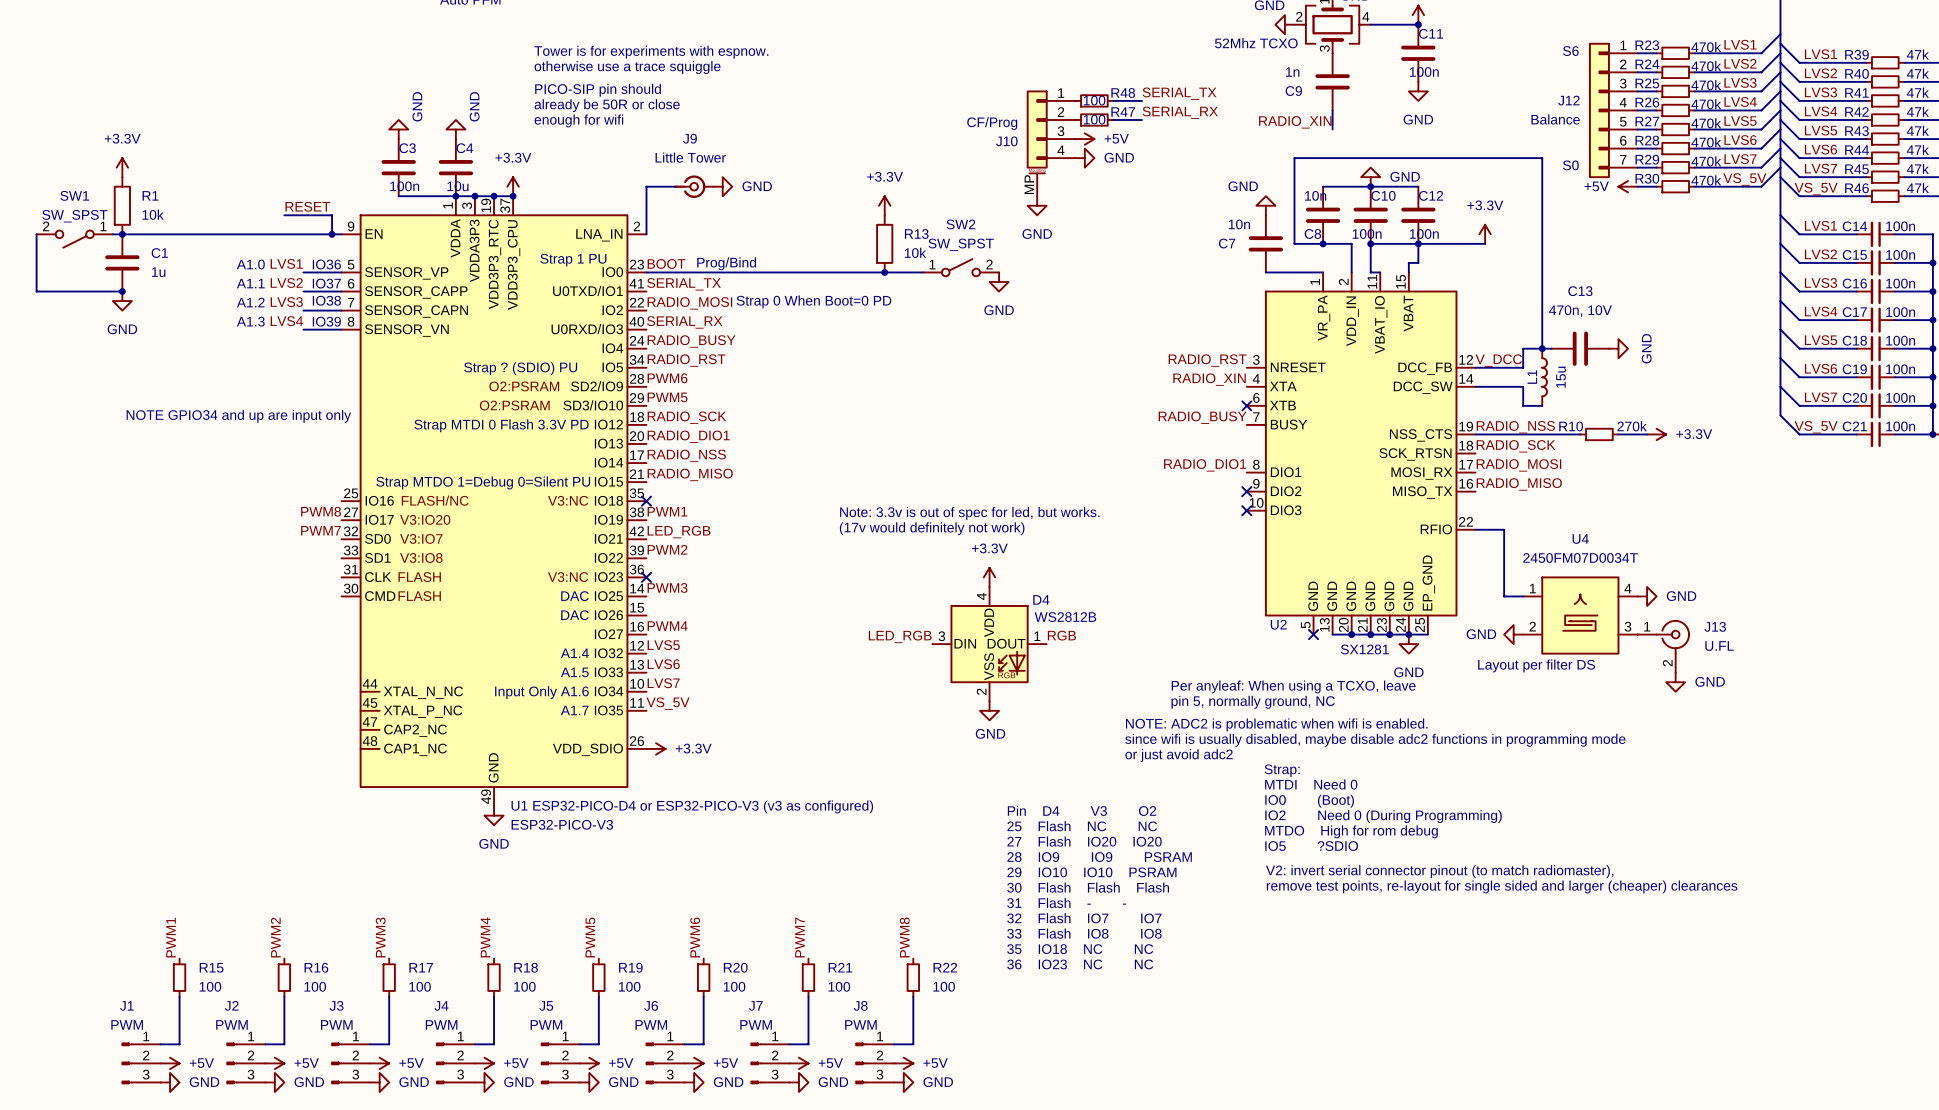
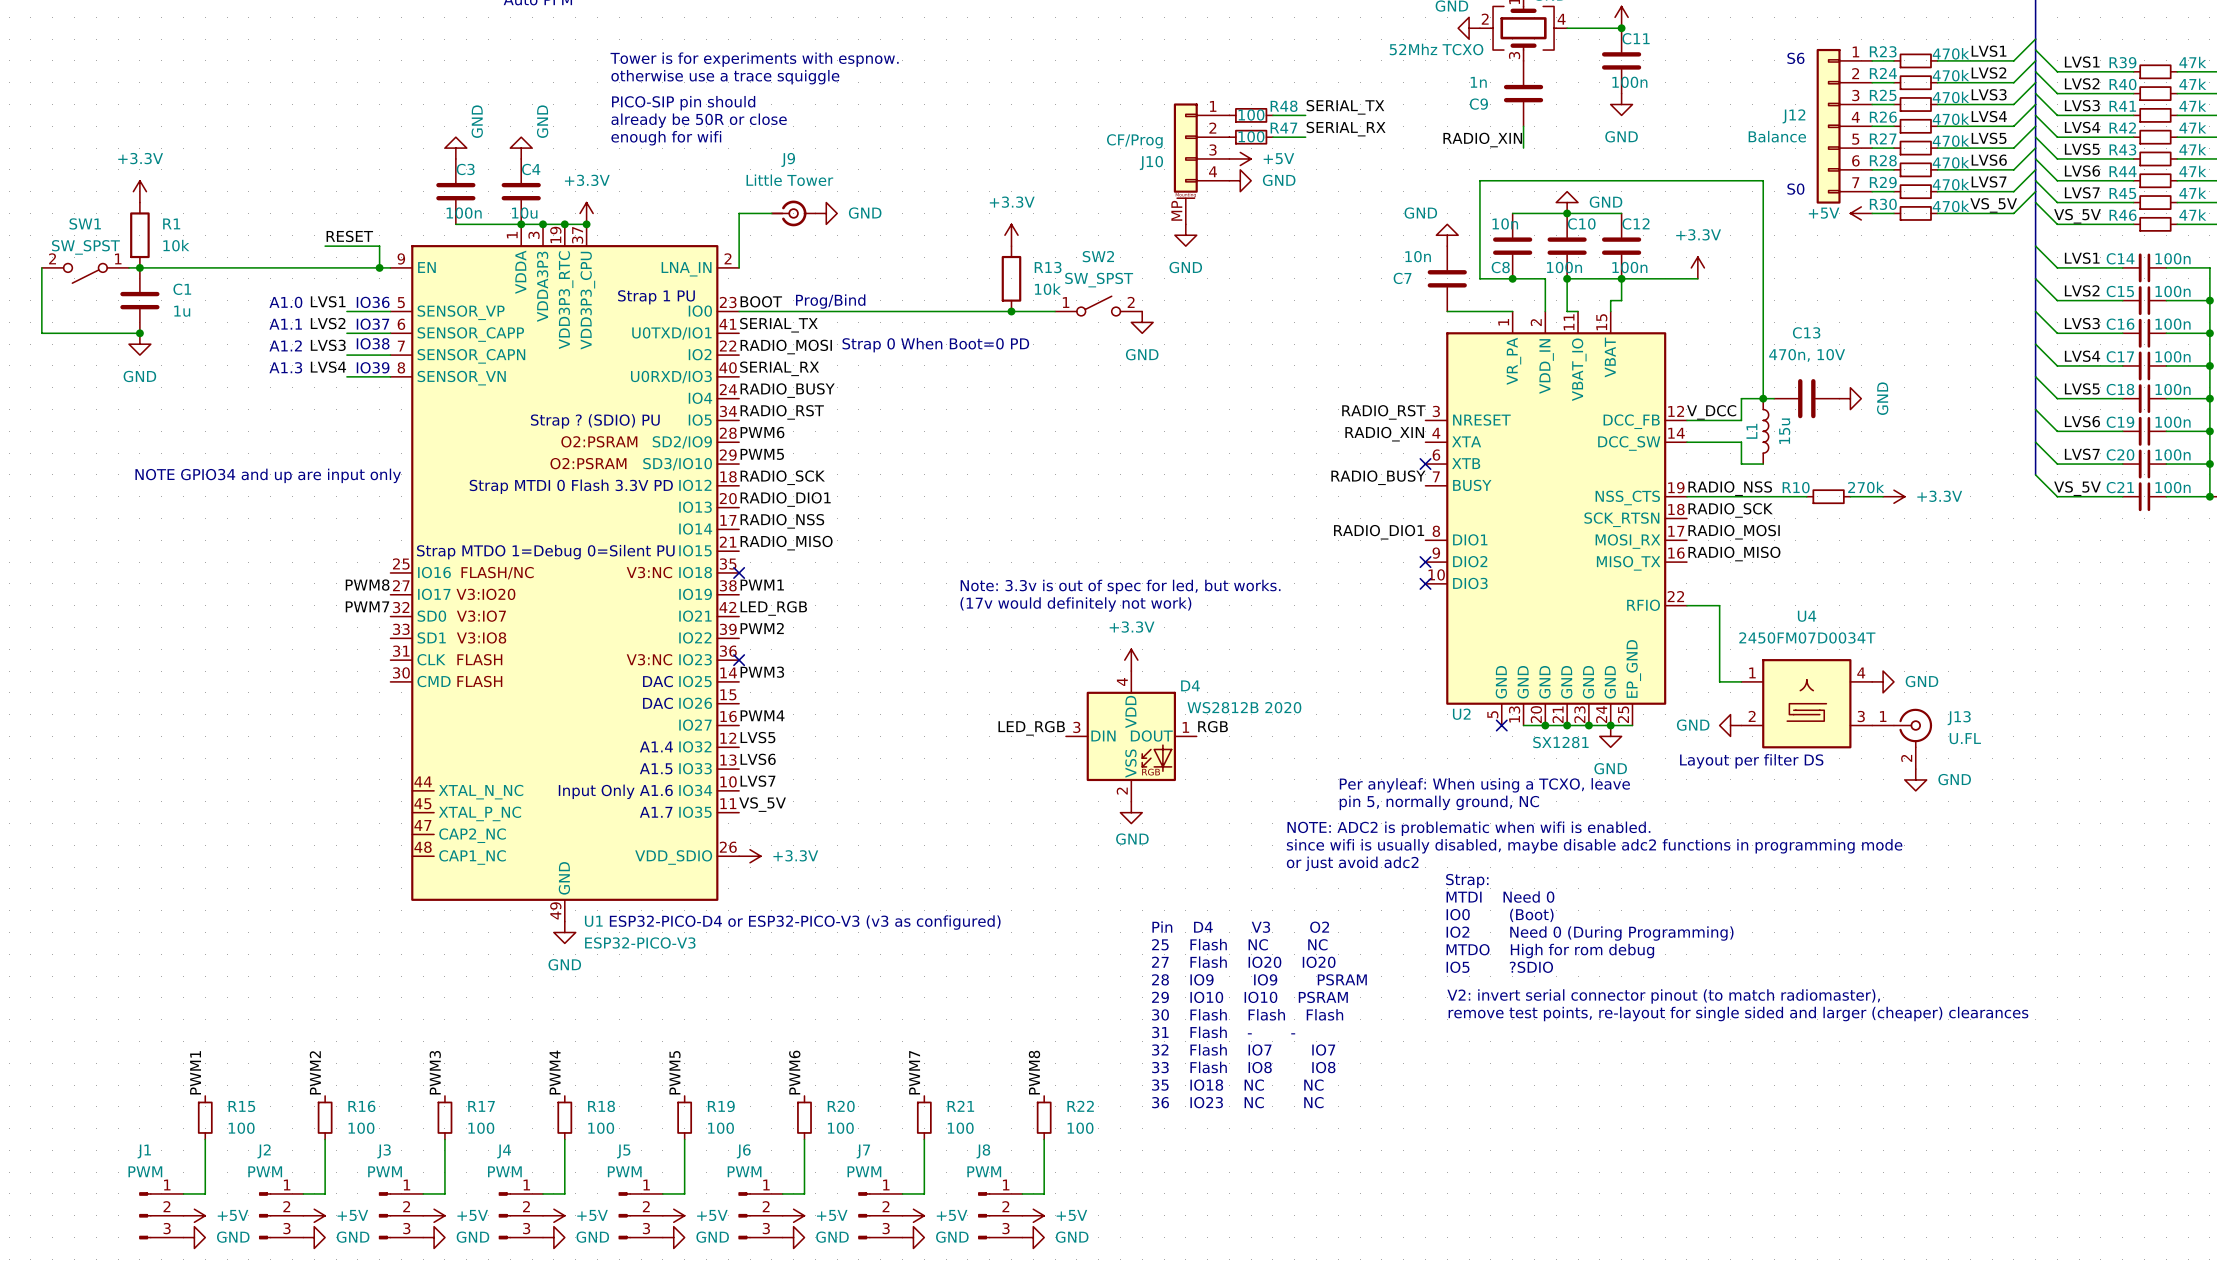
D4 value: WS2812B (1065, 617) -> WS2812B 2020 (1244, 707)

